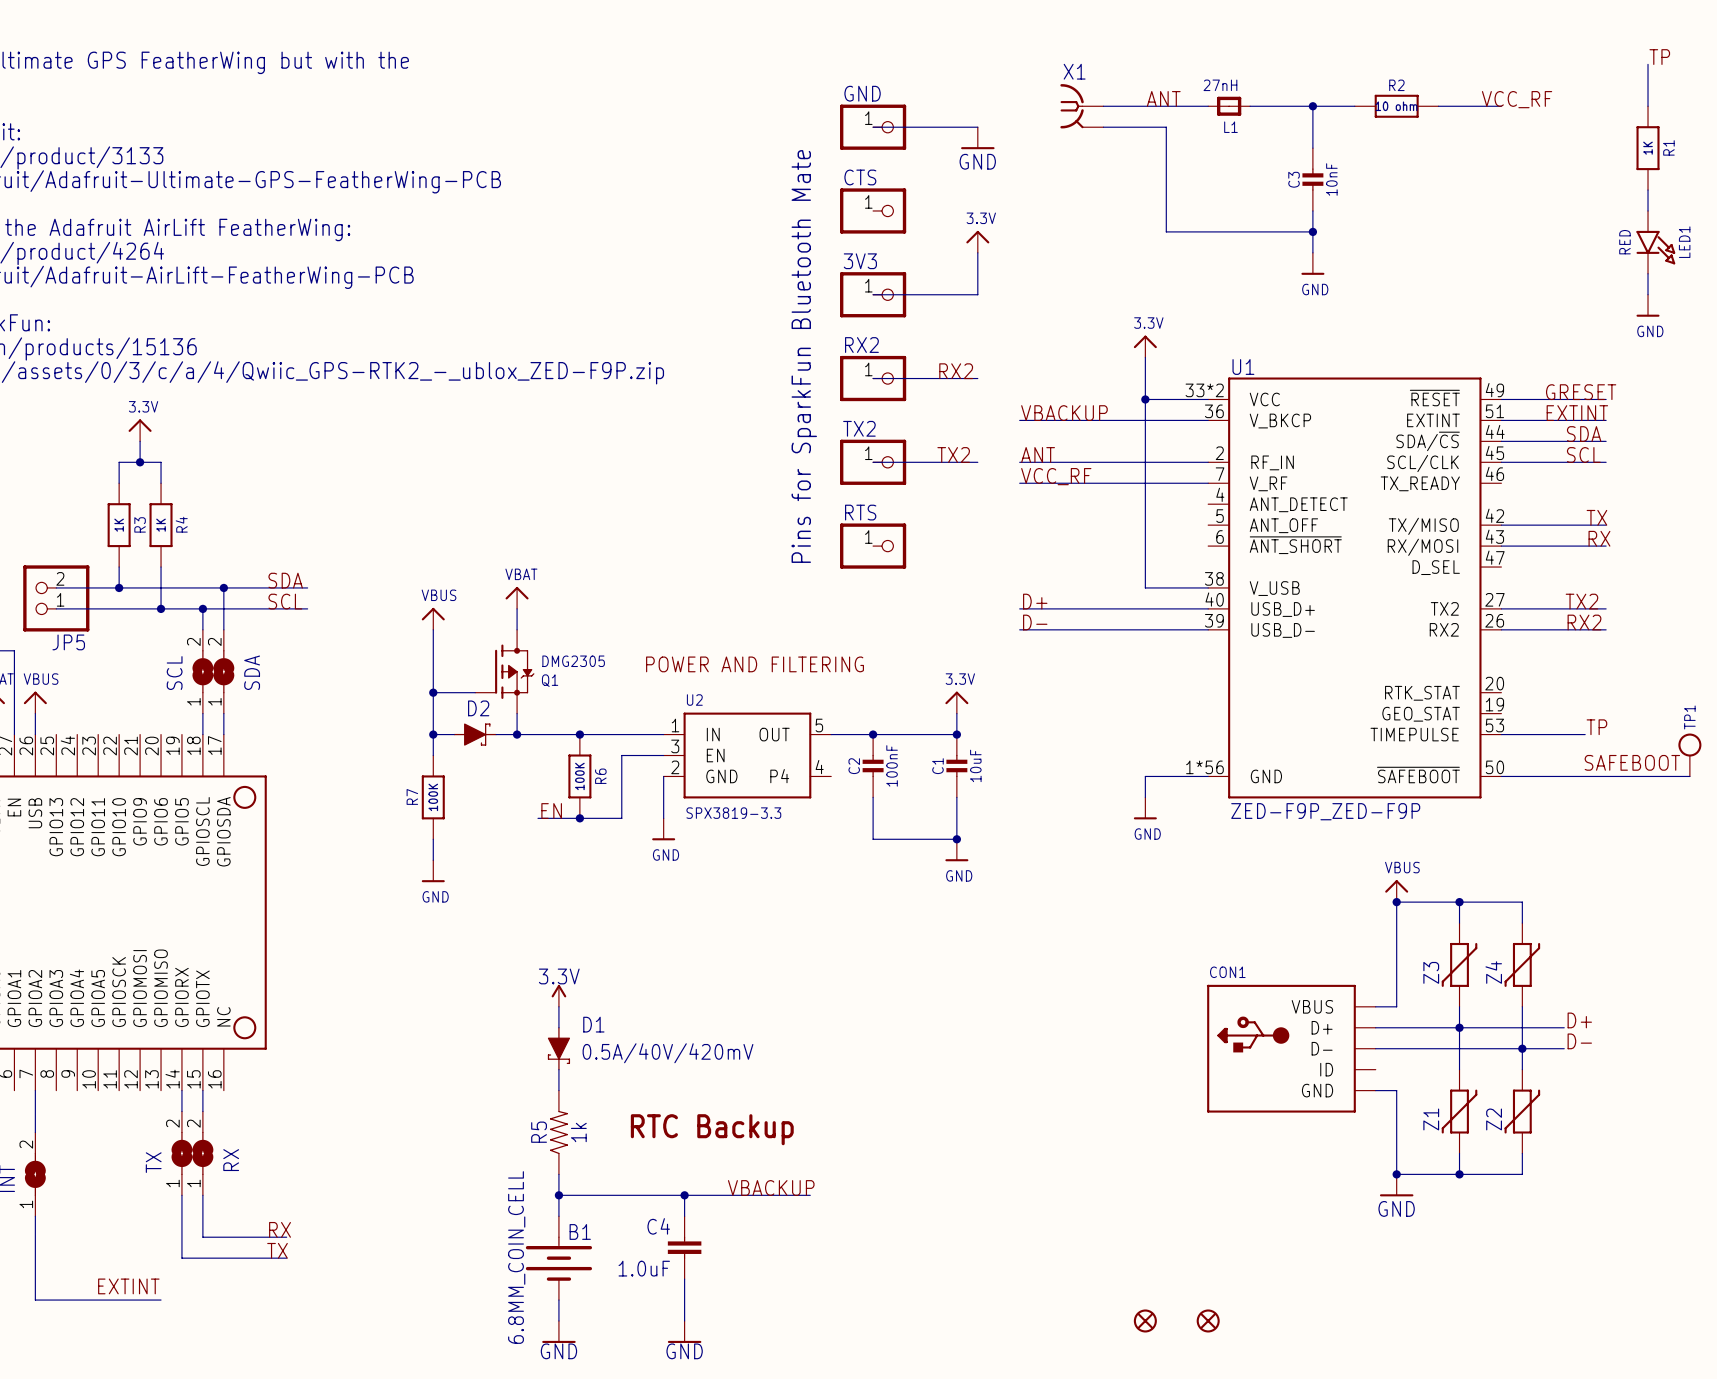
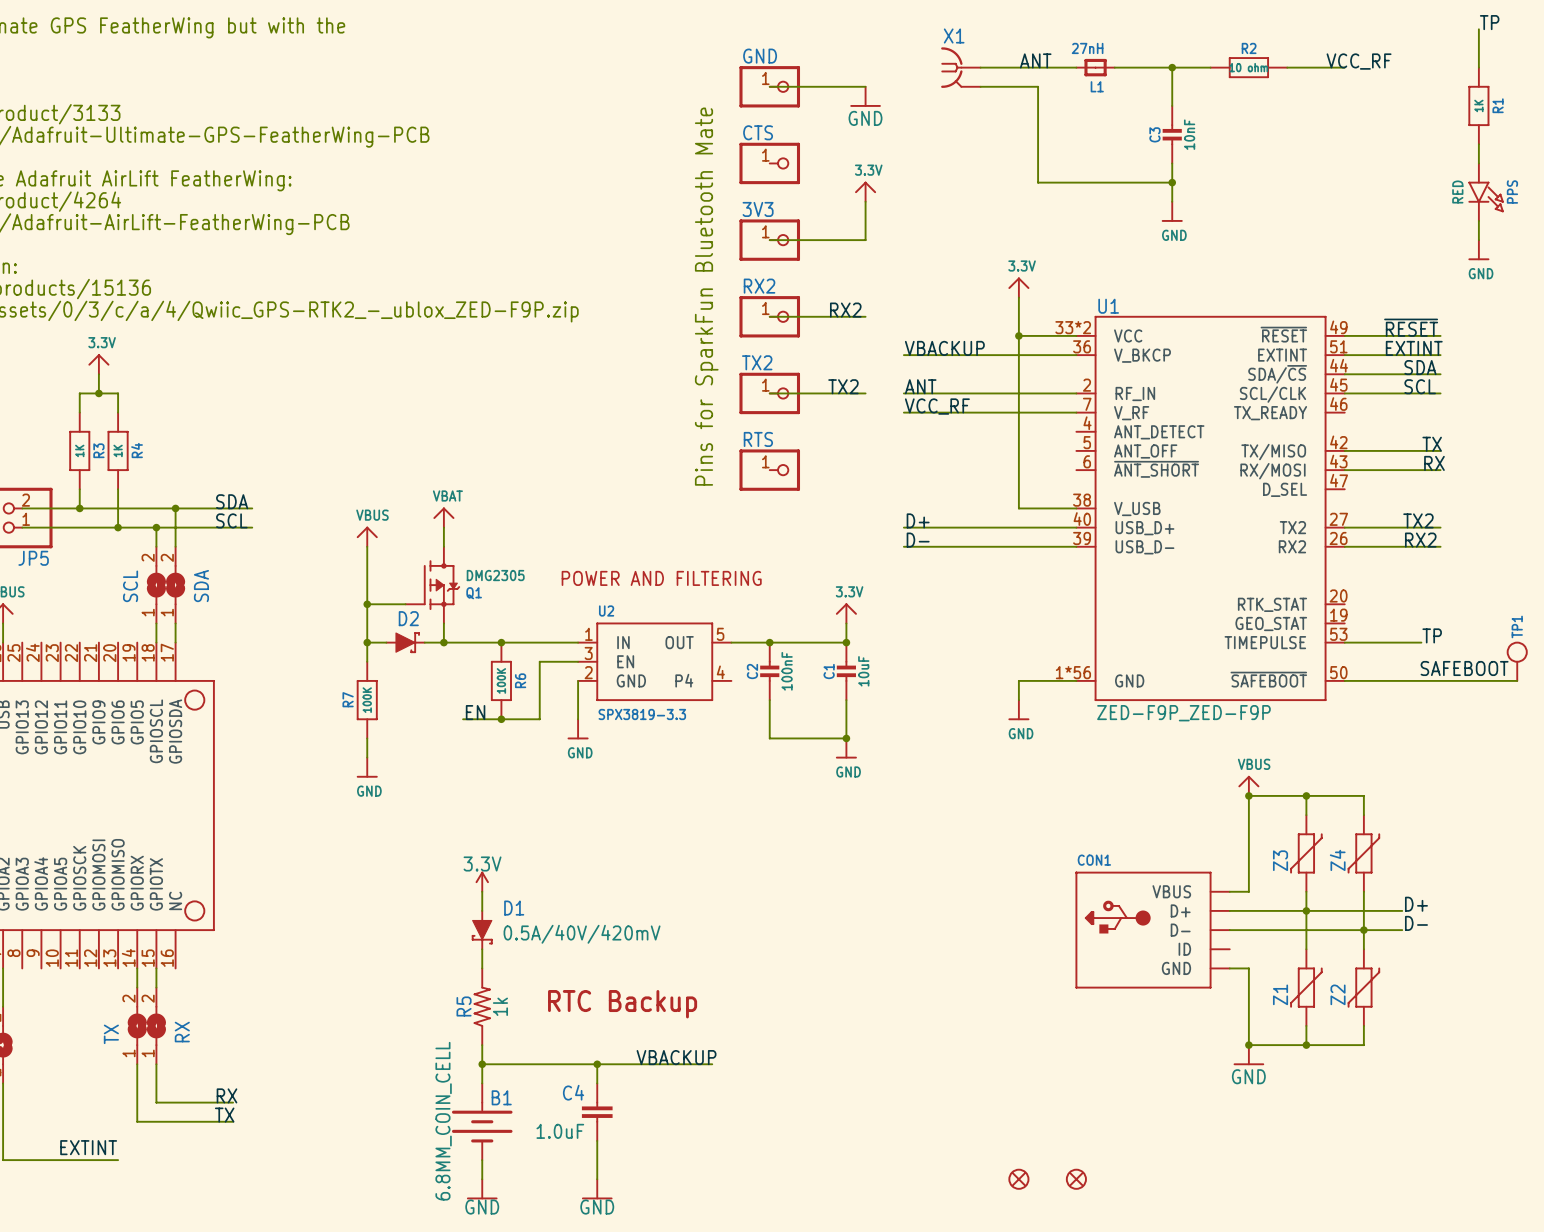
LED1 name: LED1 (1684, 242) -> PPS (1512, 192)
label: GRESET (1581, 392) -> ~{RESET} (1411, 327)

